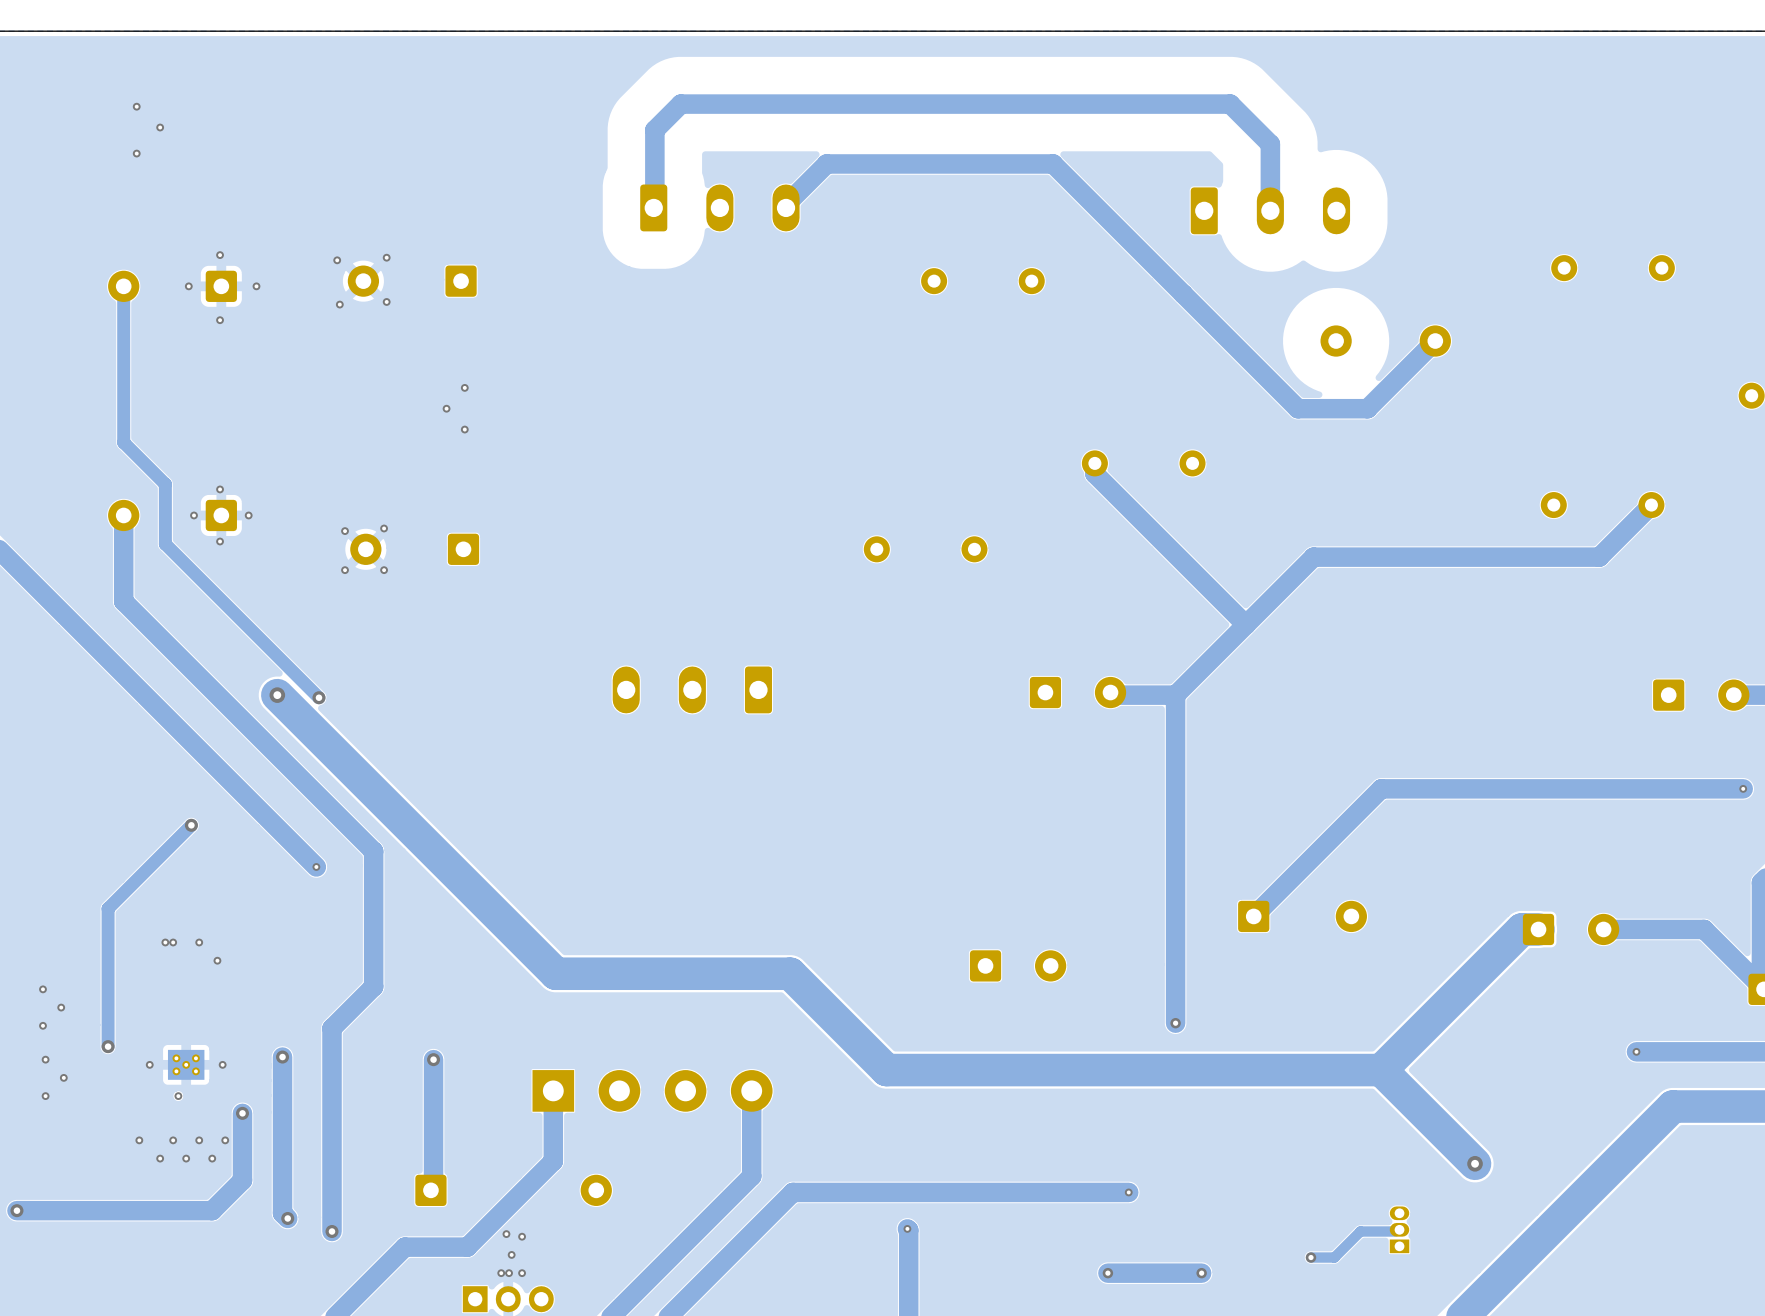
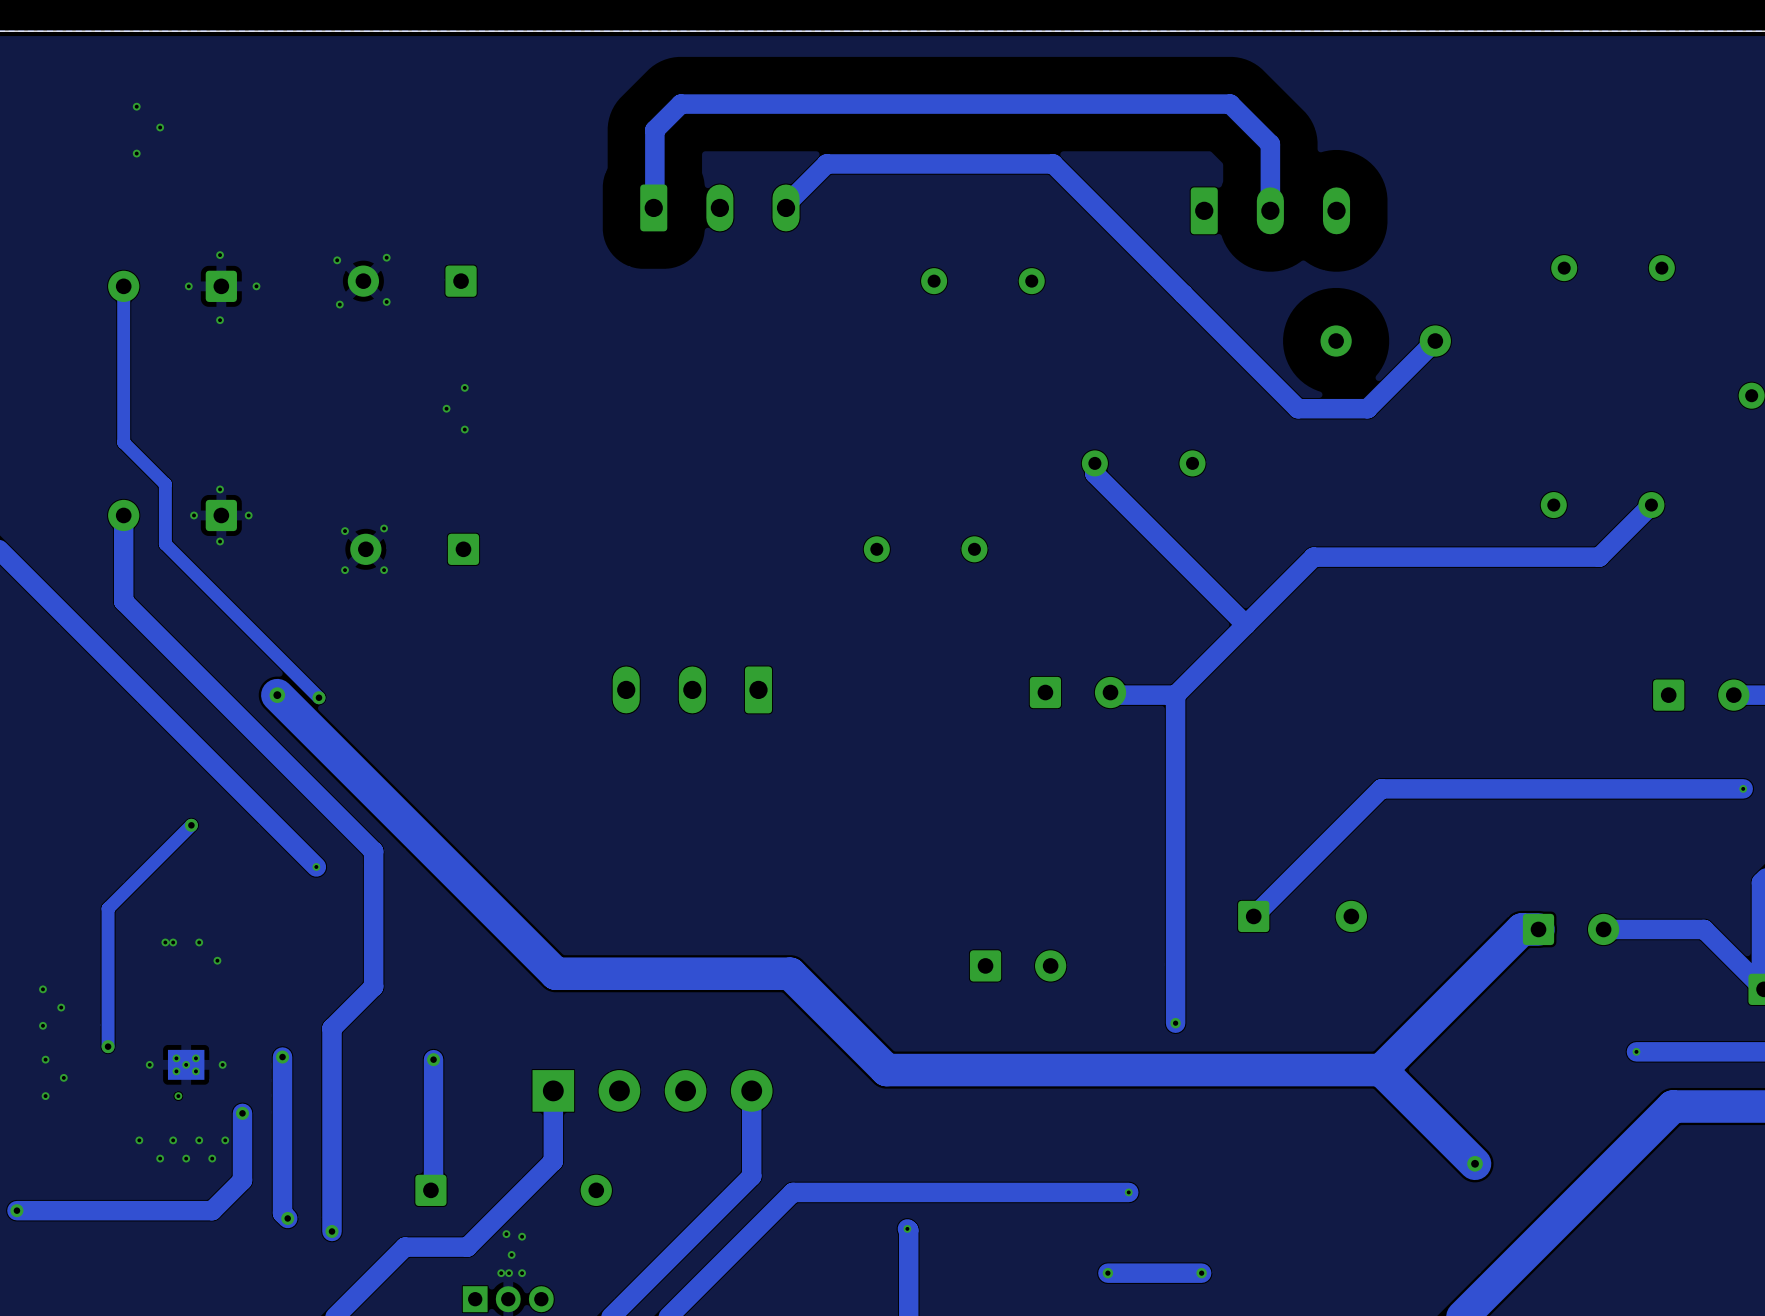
part: (1399, 1229) -> none
track: (1395, 1231) (1360, 1231) (1334, 1257) (1311, 1257) -> none
via: (1311, 1257) -> none

